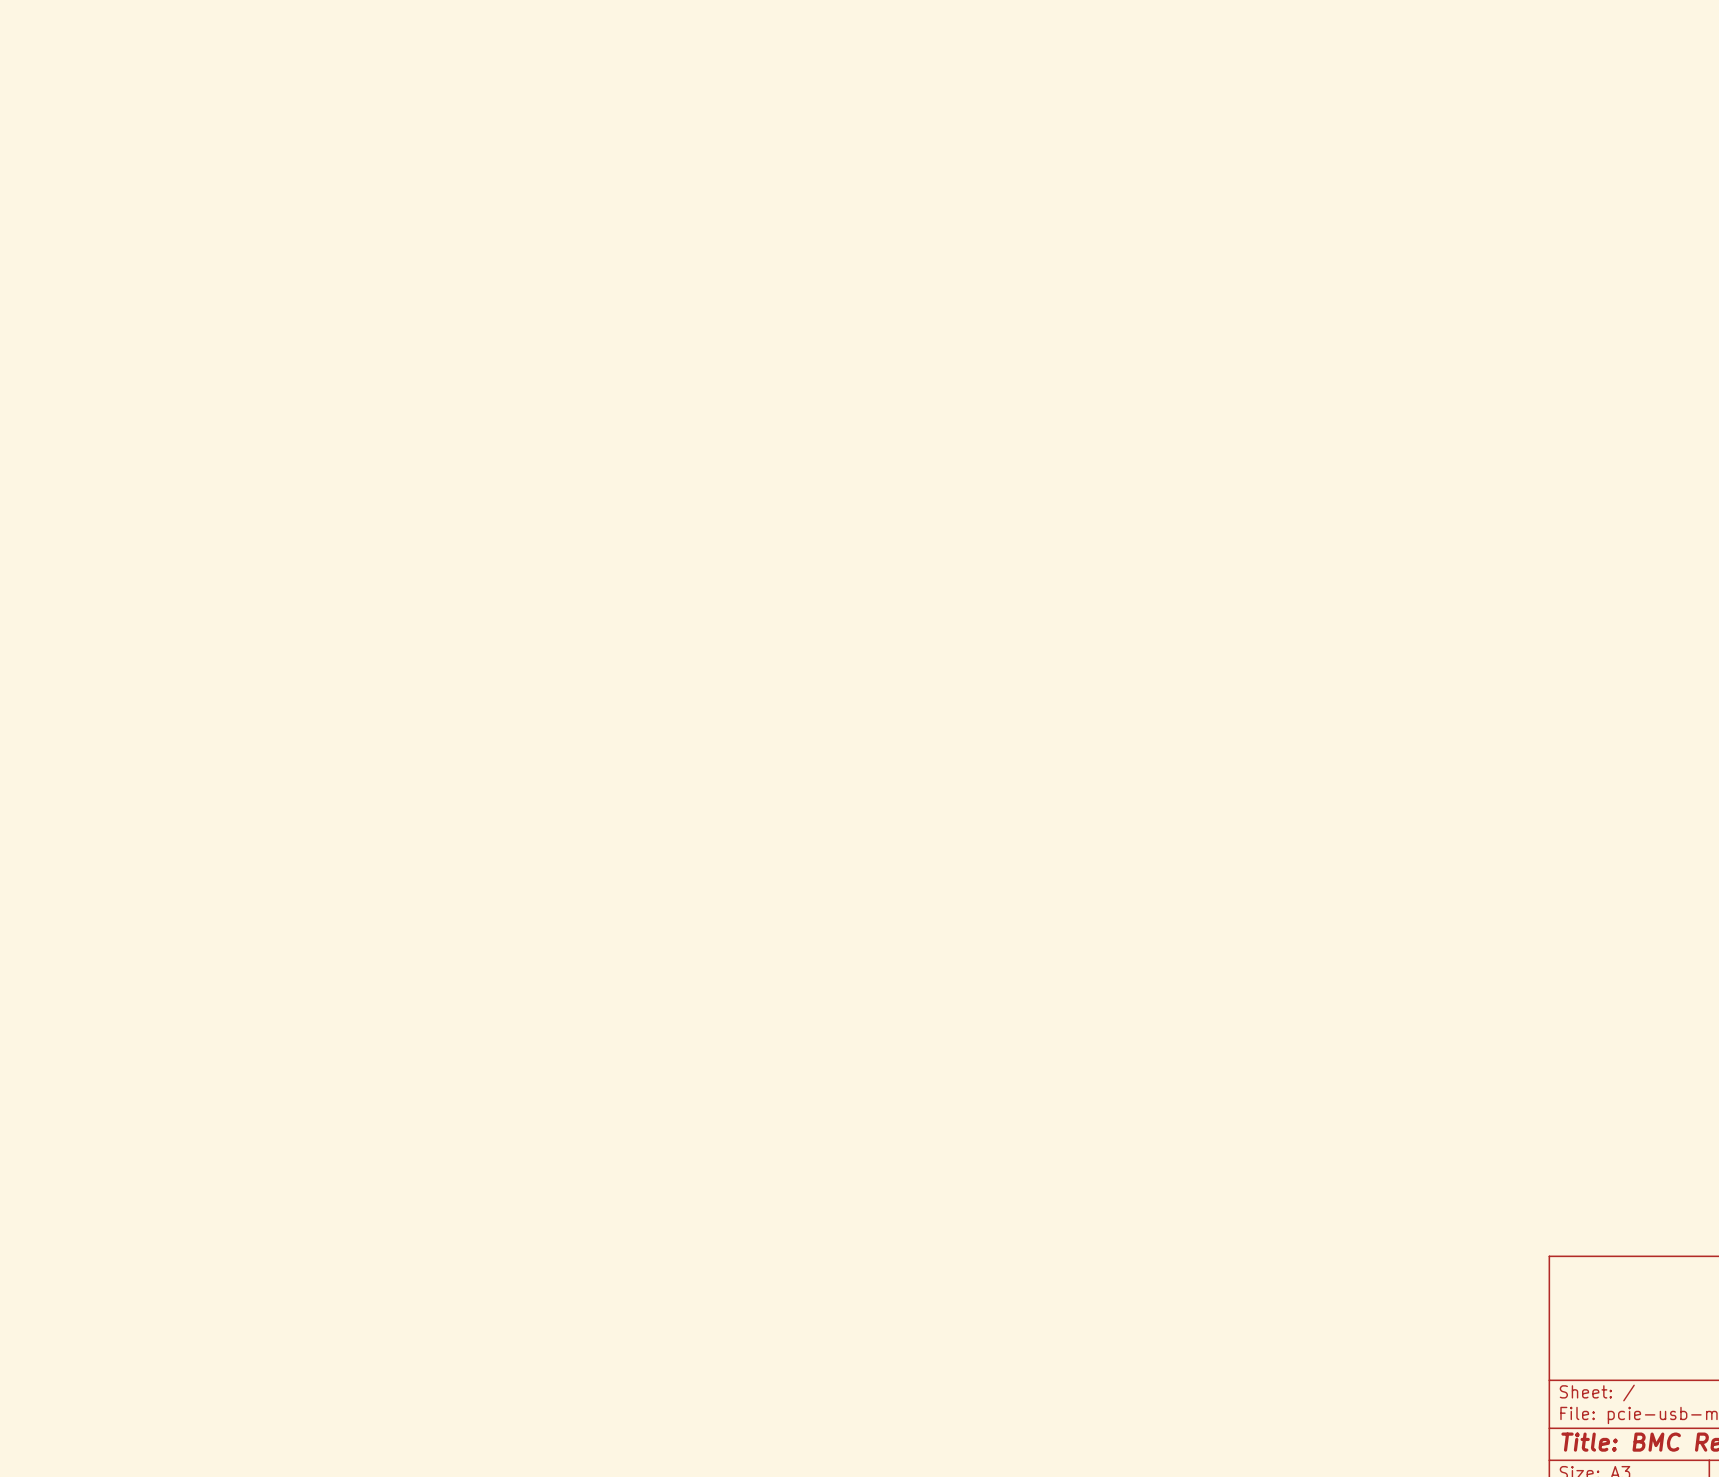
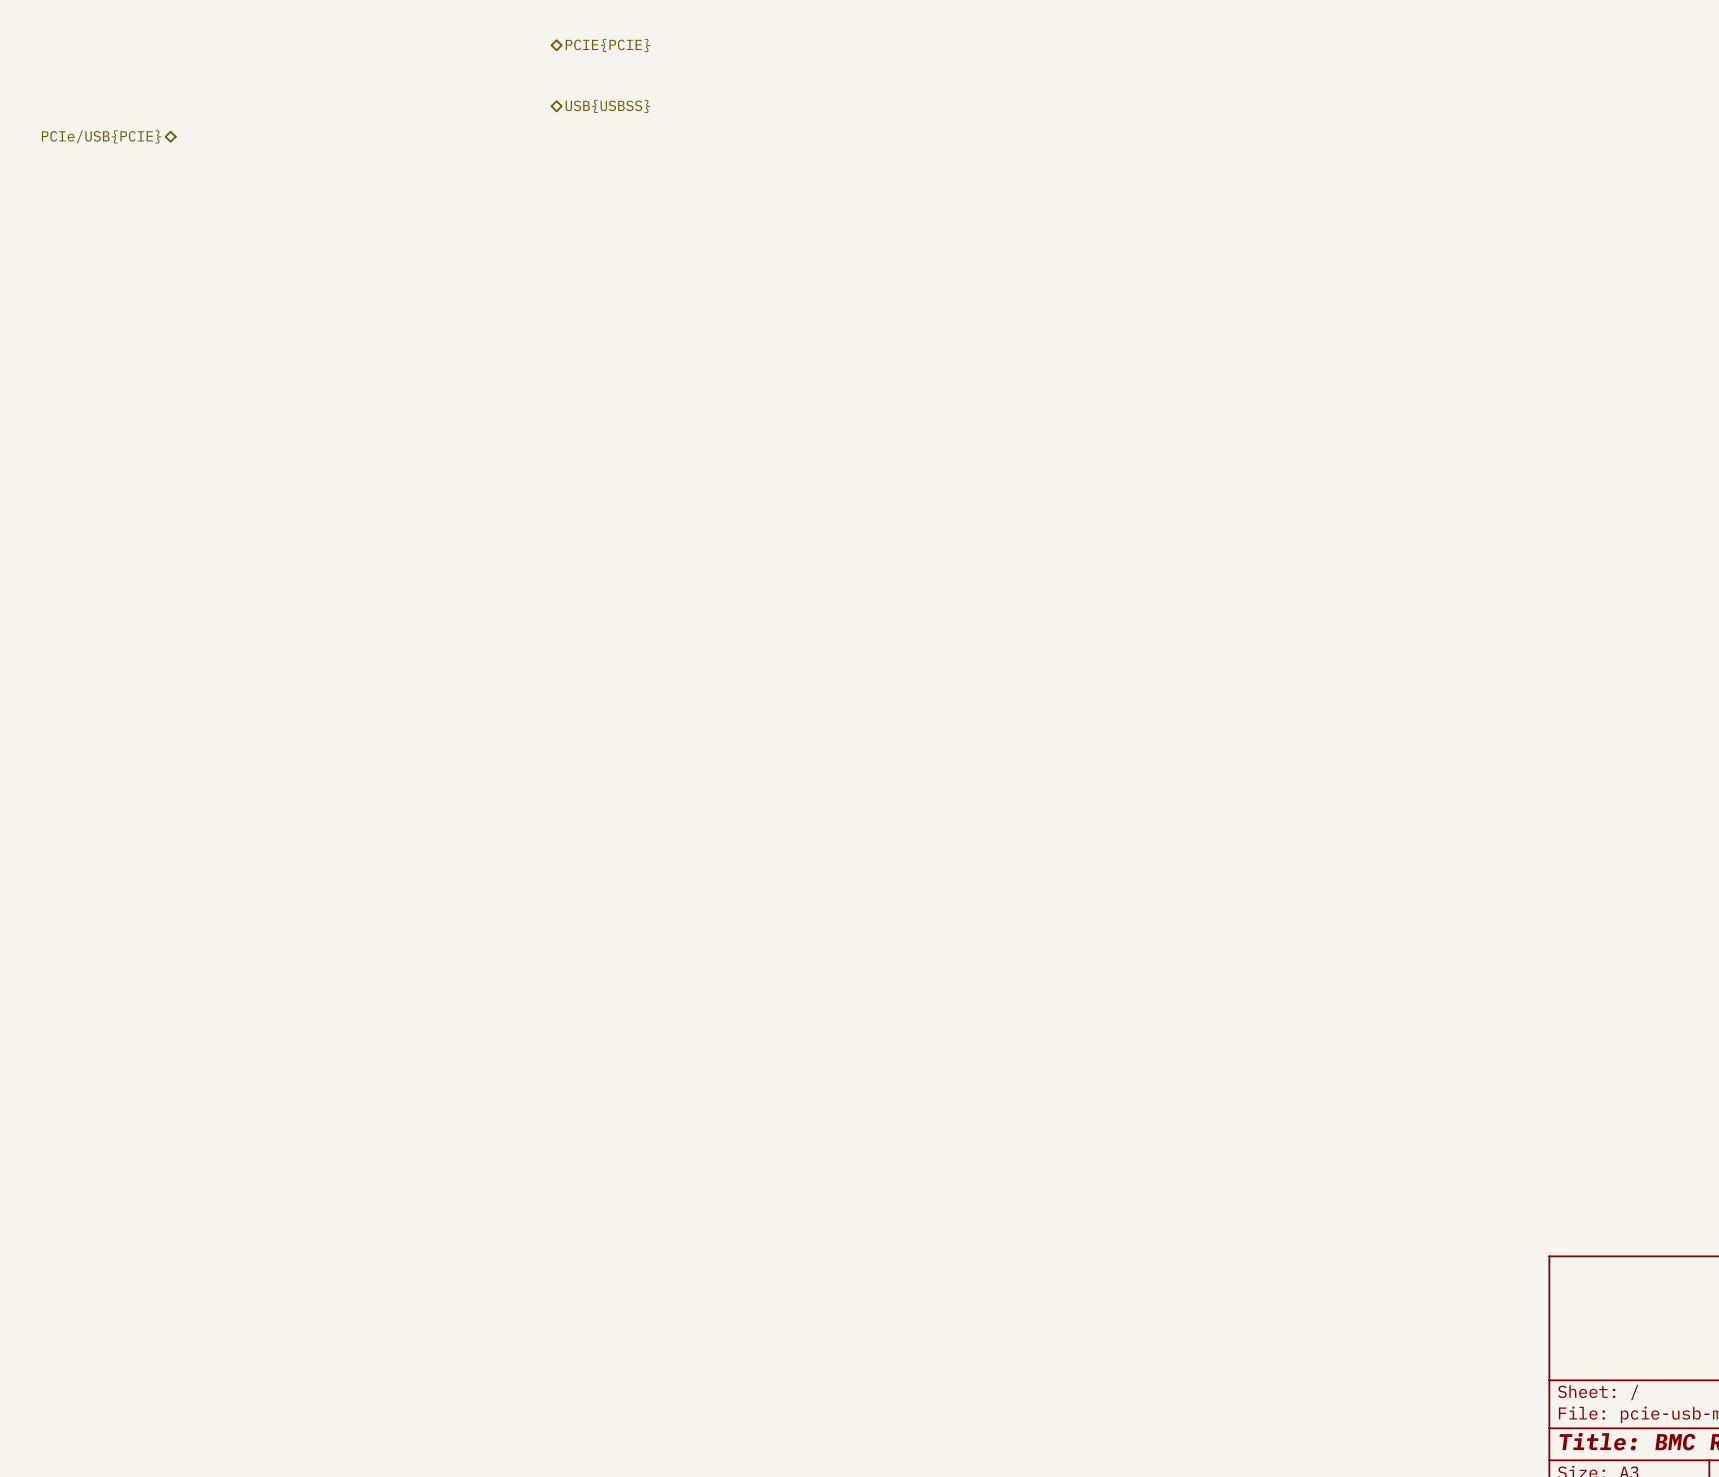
hierarchical label: none -> PCIE{PCIE} (608, 45)
hierarchical label: none -> USB{USBSS} (607, 106)
hierarchical label: none -> PCIe/USB{PCIE} (101, 136)

